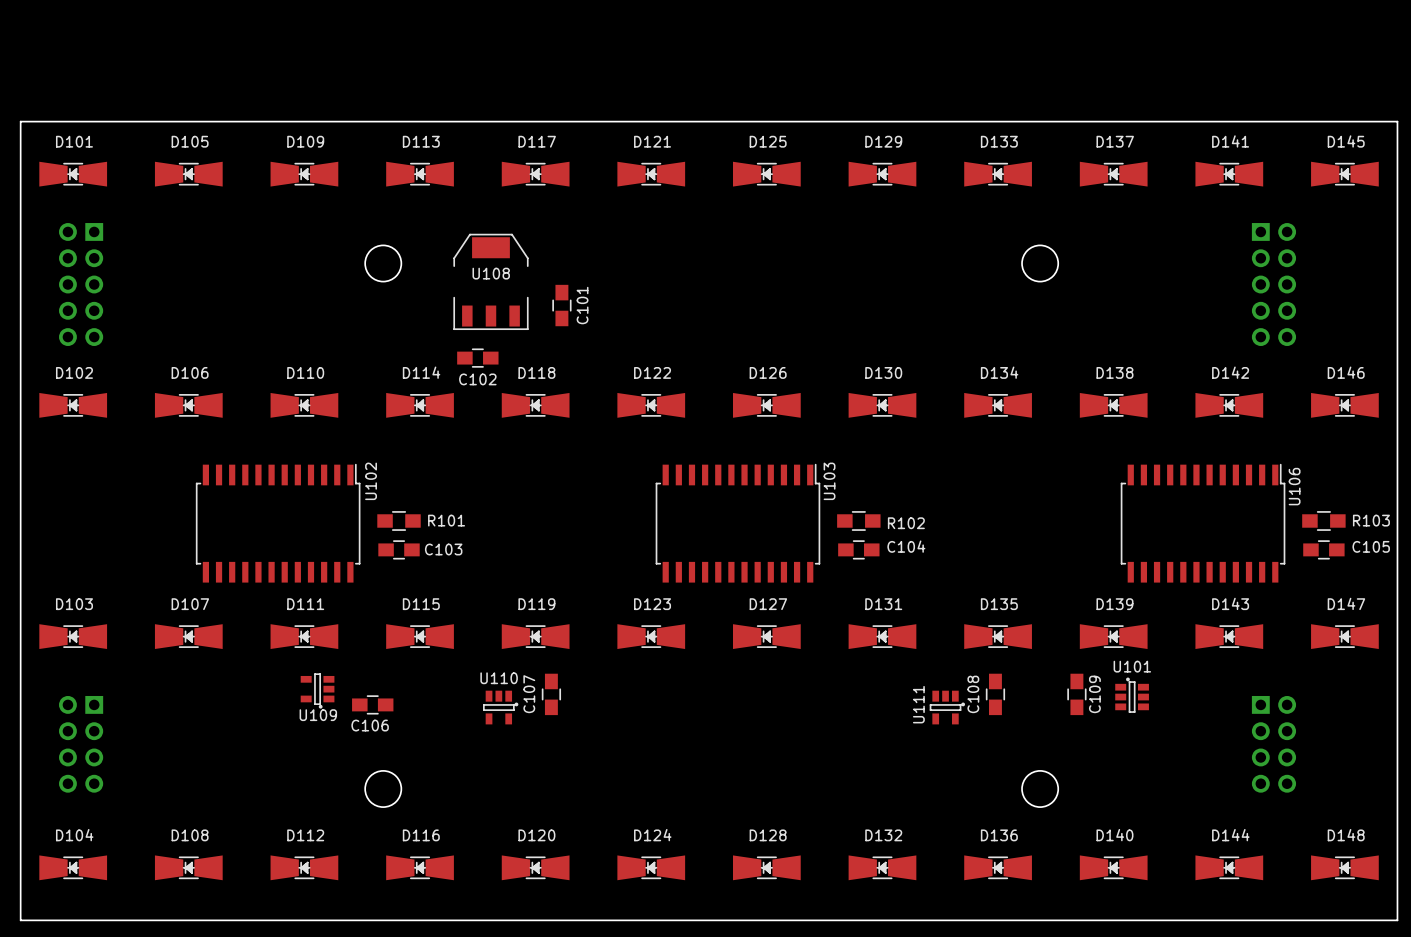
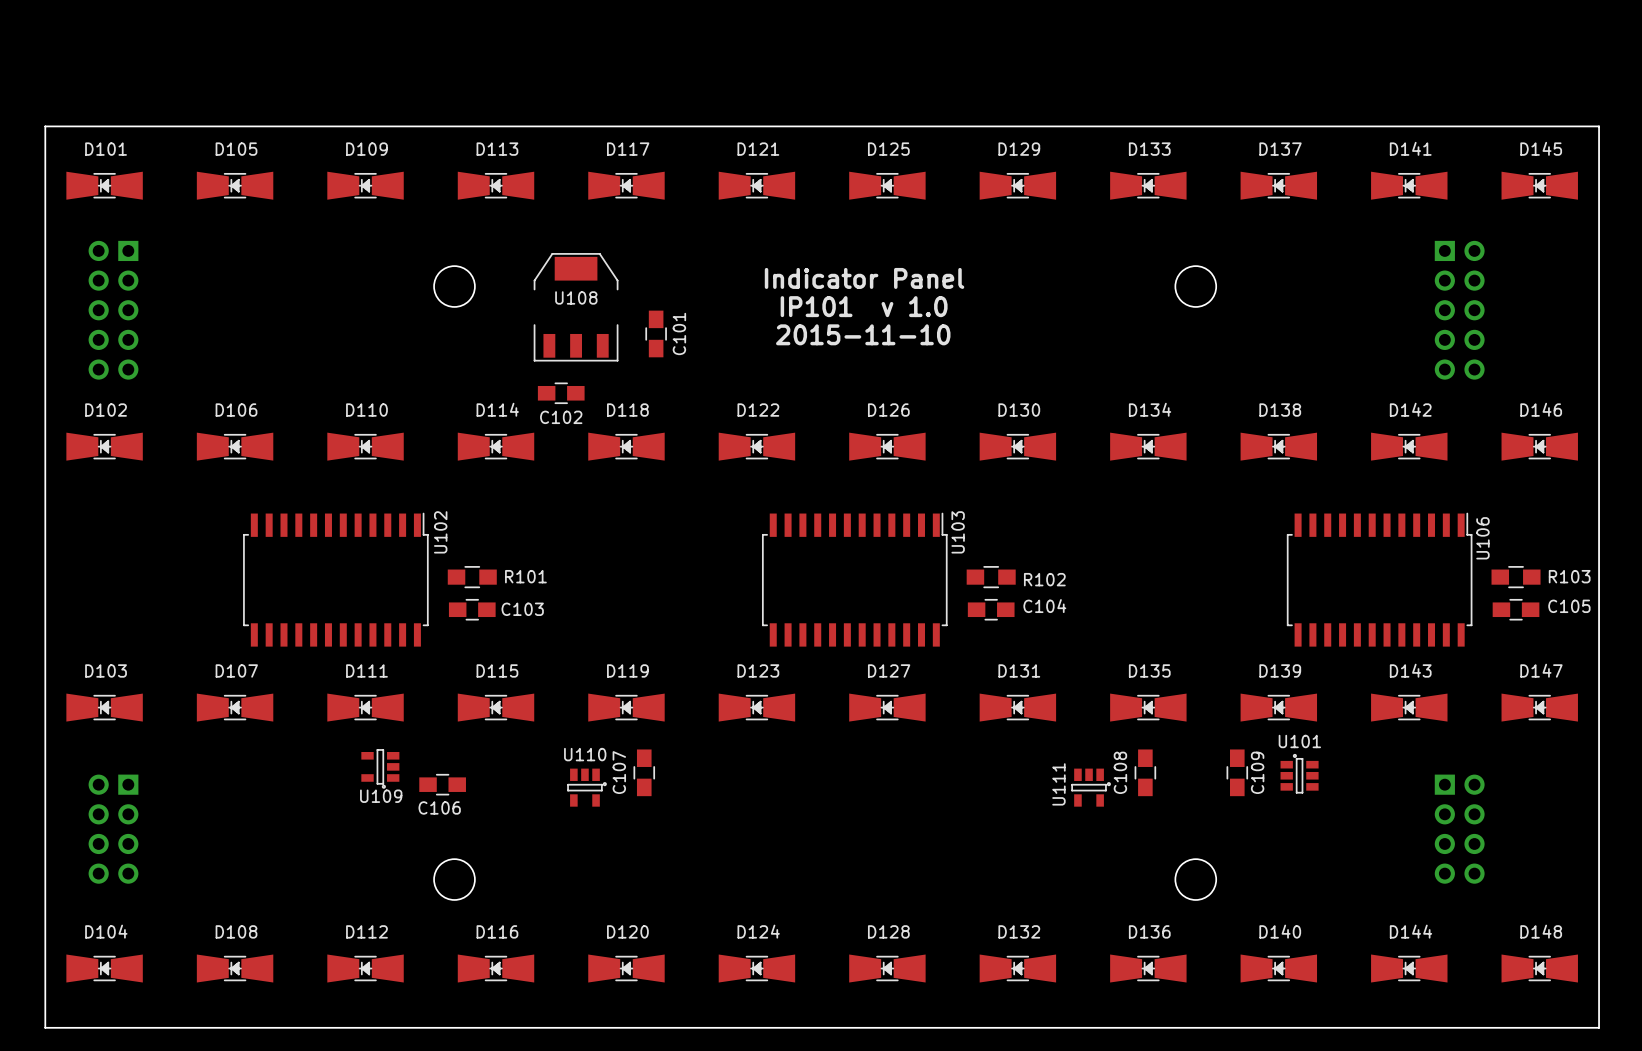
text: none -> Indicator Panel (864, 278)
text: none -> IP101 v 1.0 (864, 306)
text: none -> 2015-11-10 (863, 334)

